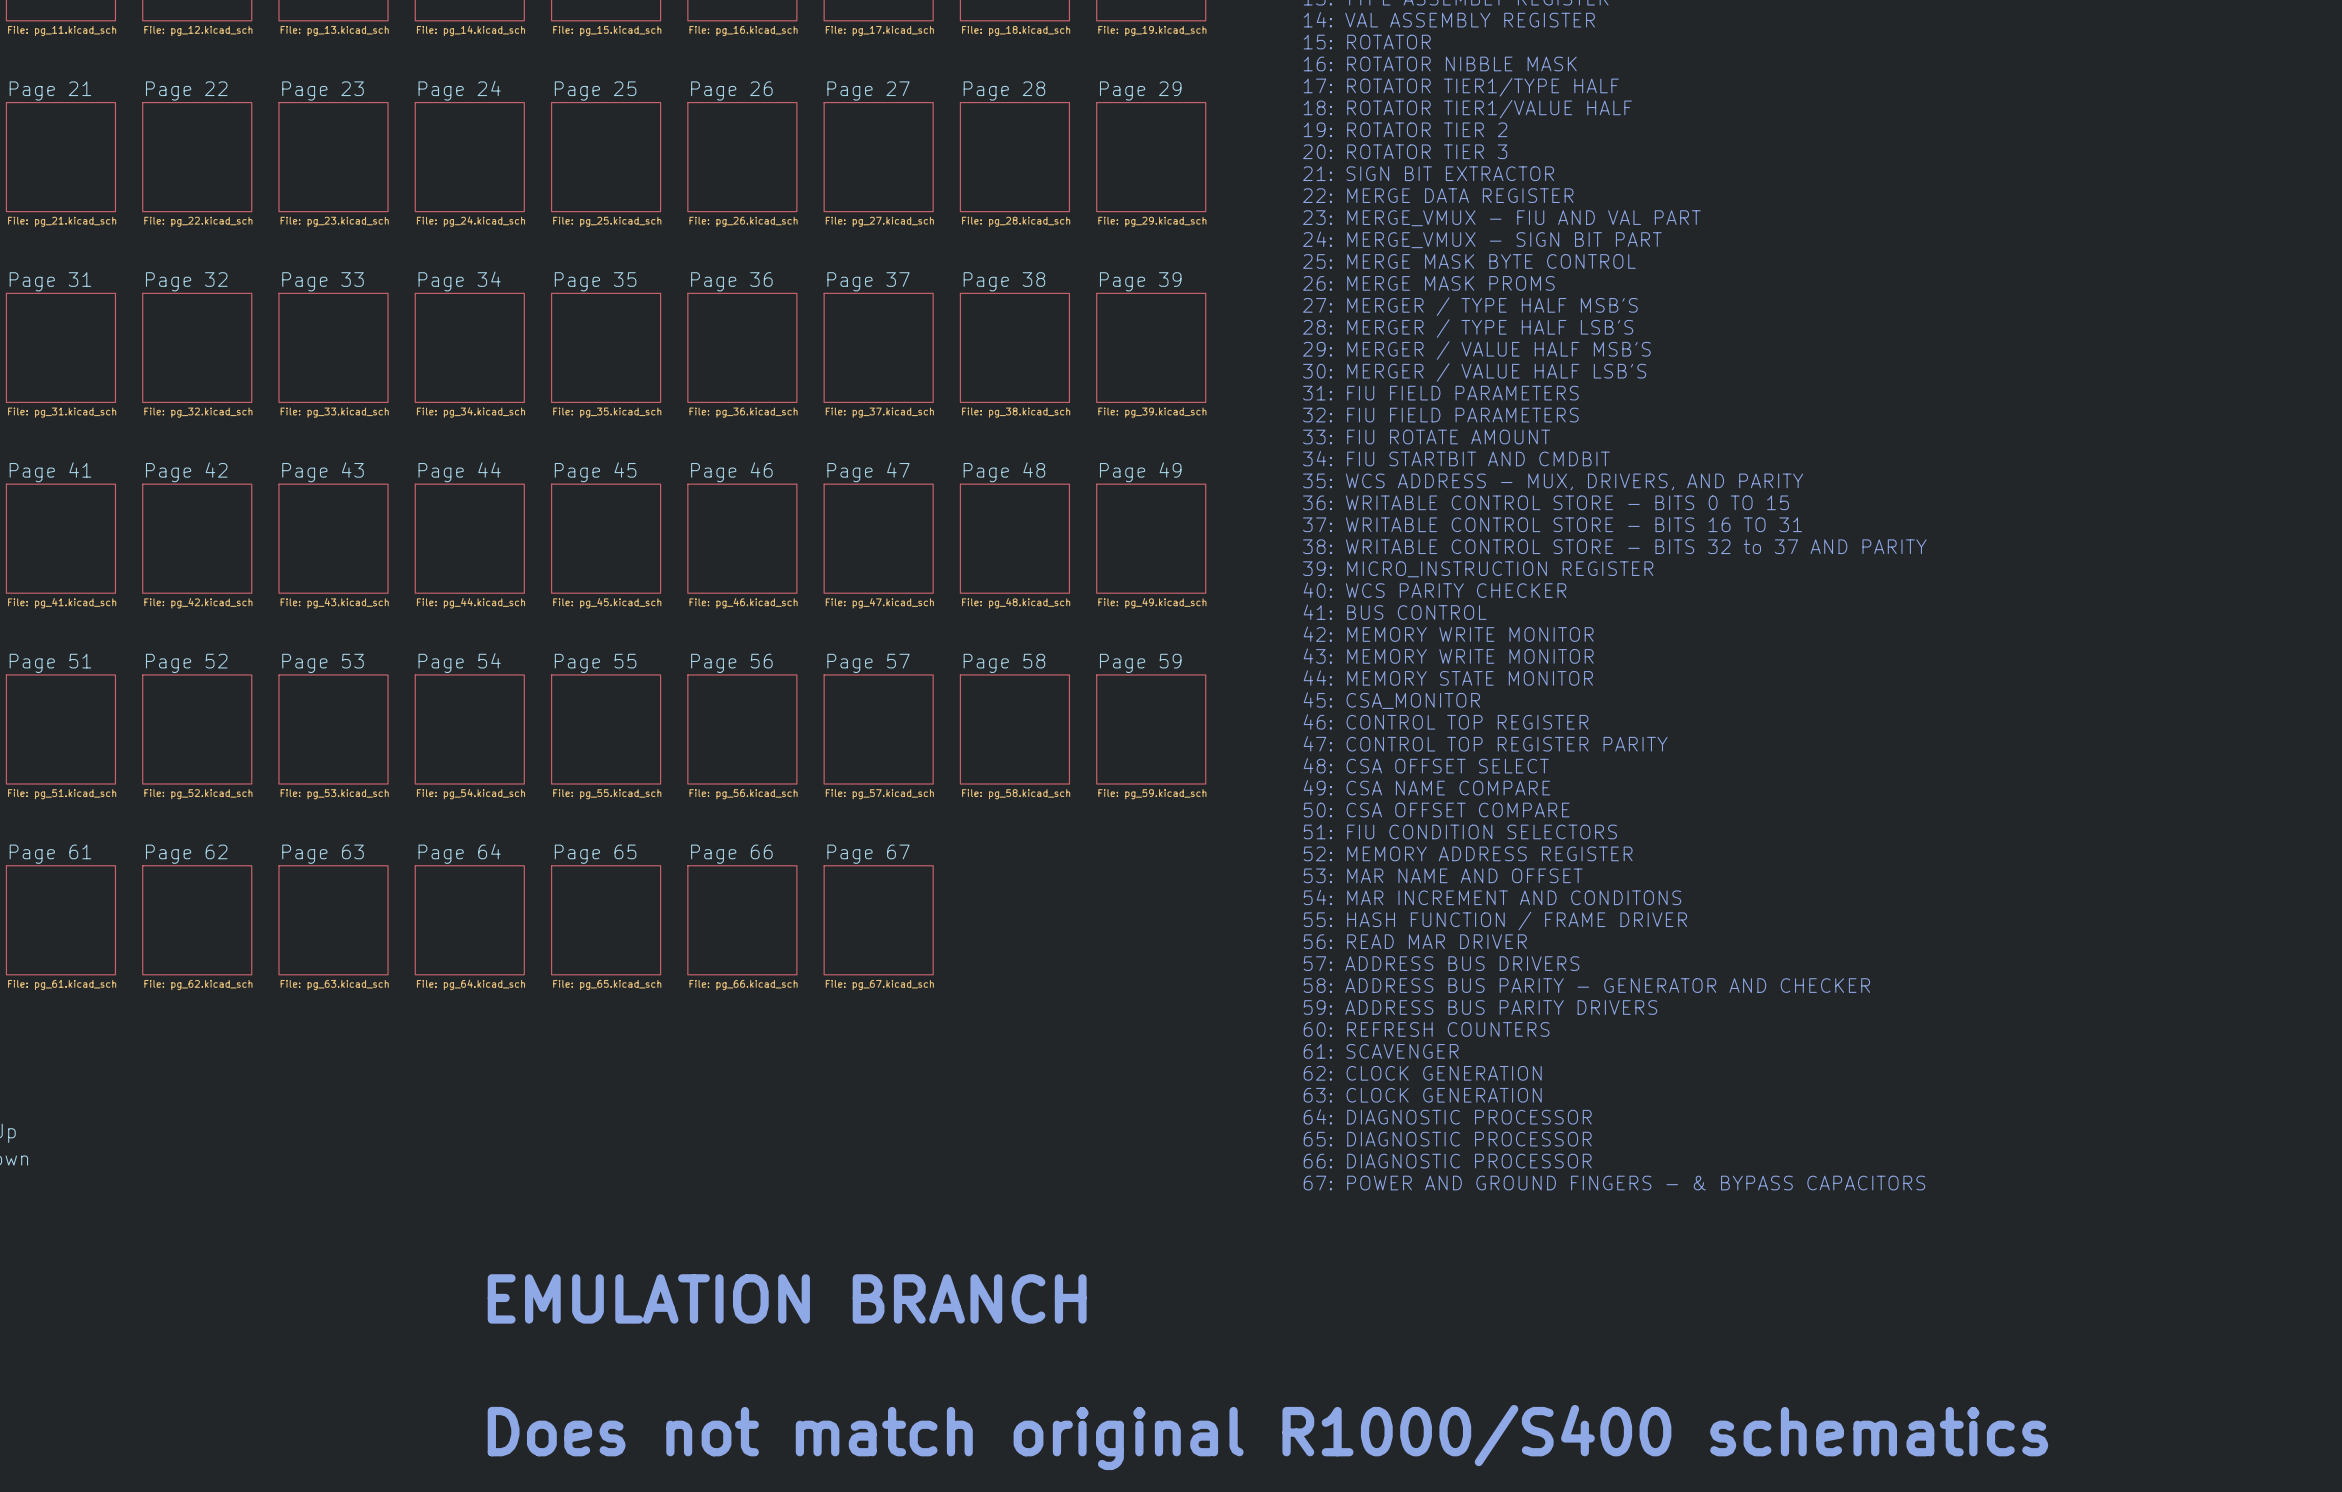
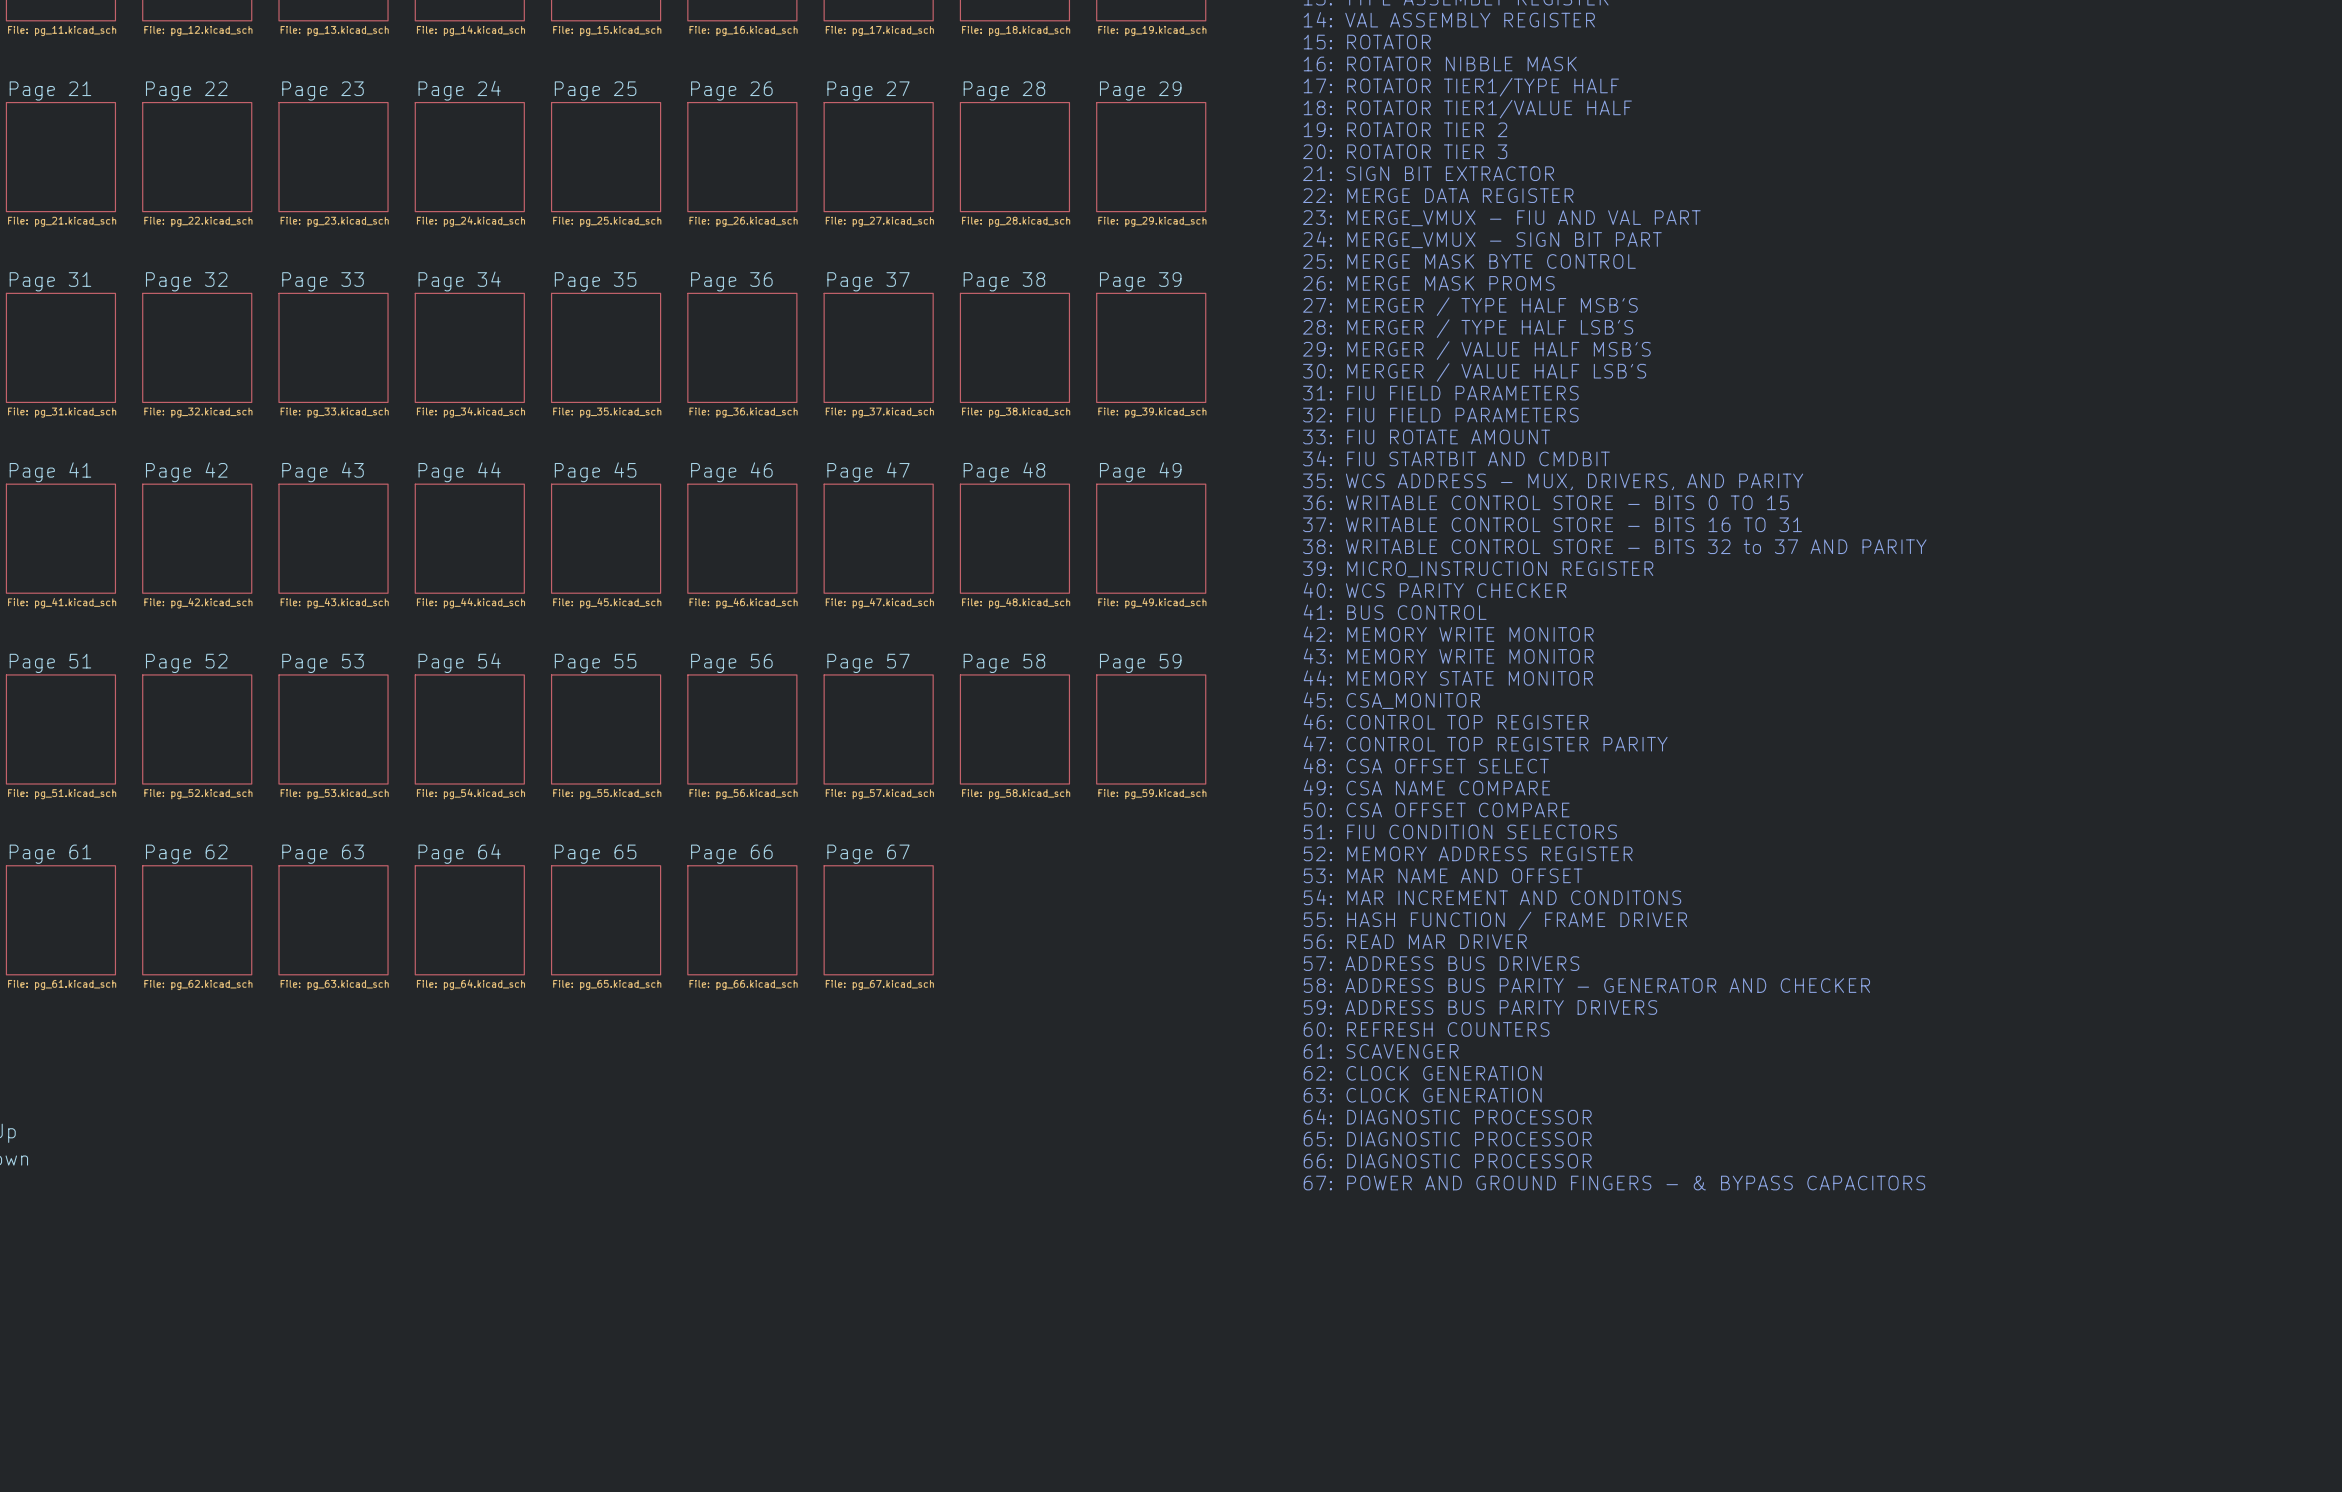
text: EMULATION BRANCH (787, 1298) -> none
text: Does not match original R1000/S400 schematics (1267, 1437) -> none

